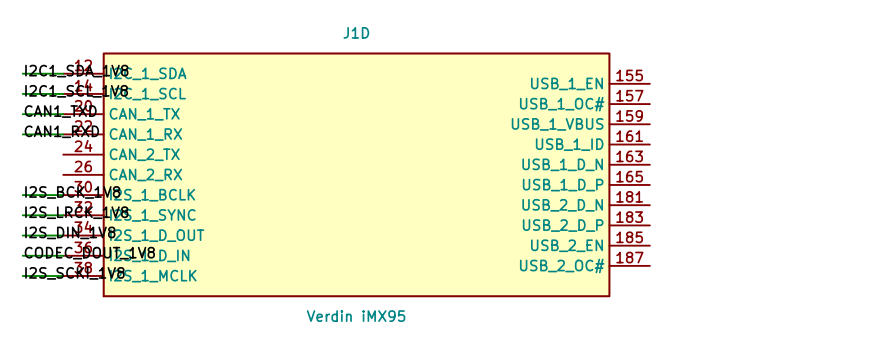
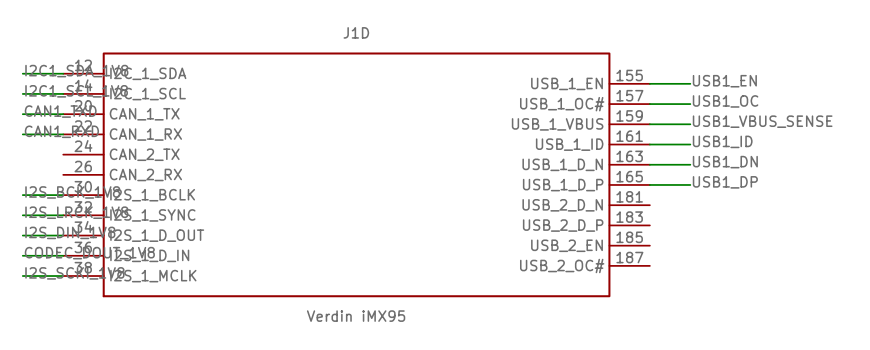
label: none -> USB1_EN (724, 81)
wire: none -> (649, 83) (690, 83)
label: none -> USB1_OC (725, 101)
wire: none -> (649, 104) (690, 104)
label: none -> USB1_VBUS_SENSE (762, 121)
wire: none -> (649, 124) (690, 124)
label: none -> USB1_ID (722, 141)
wire: none -> (649, 144) (690, 144)
label: none -> USB1_DN (725, 162)
wire: none -> (649, 164) (690, 164)
label: none -> USB1_DP (725, 182)
wire: none -> (649, 184) (690, 184)

